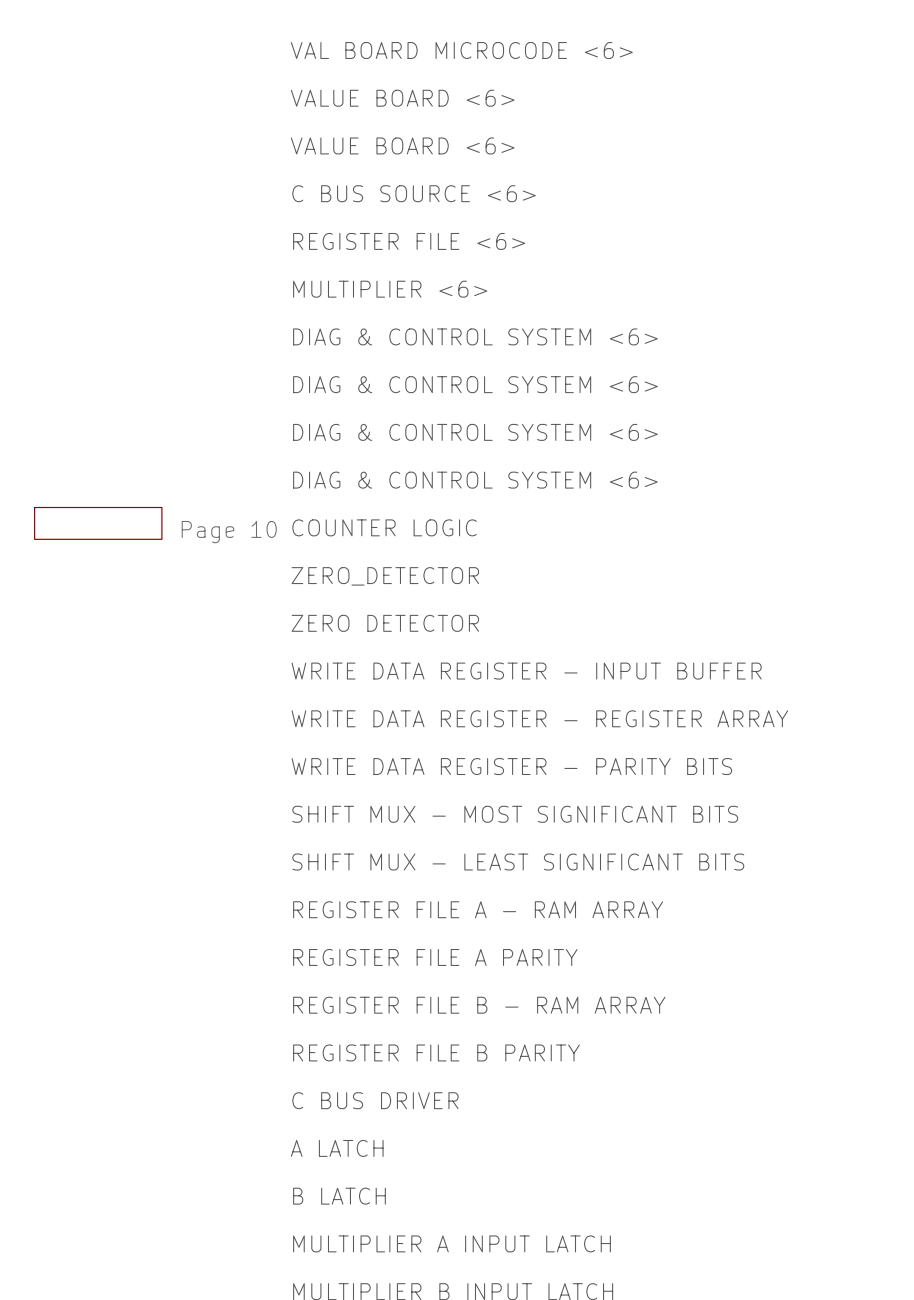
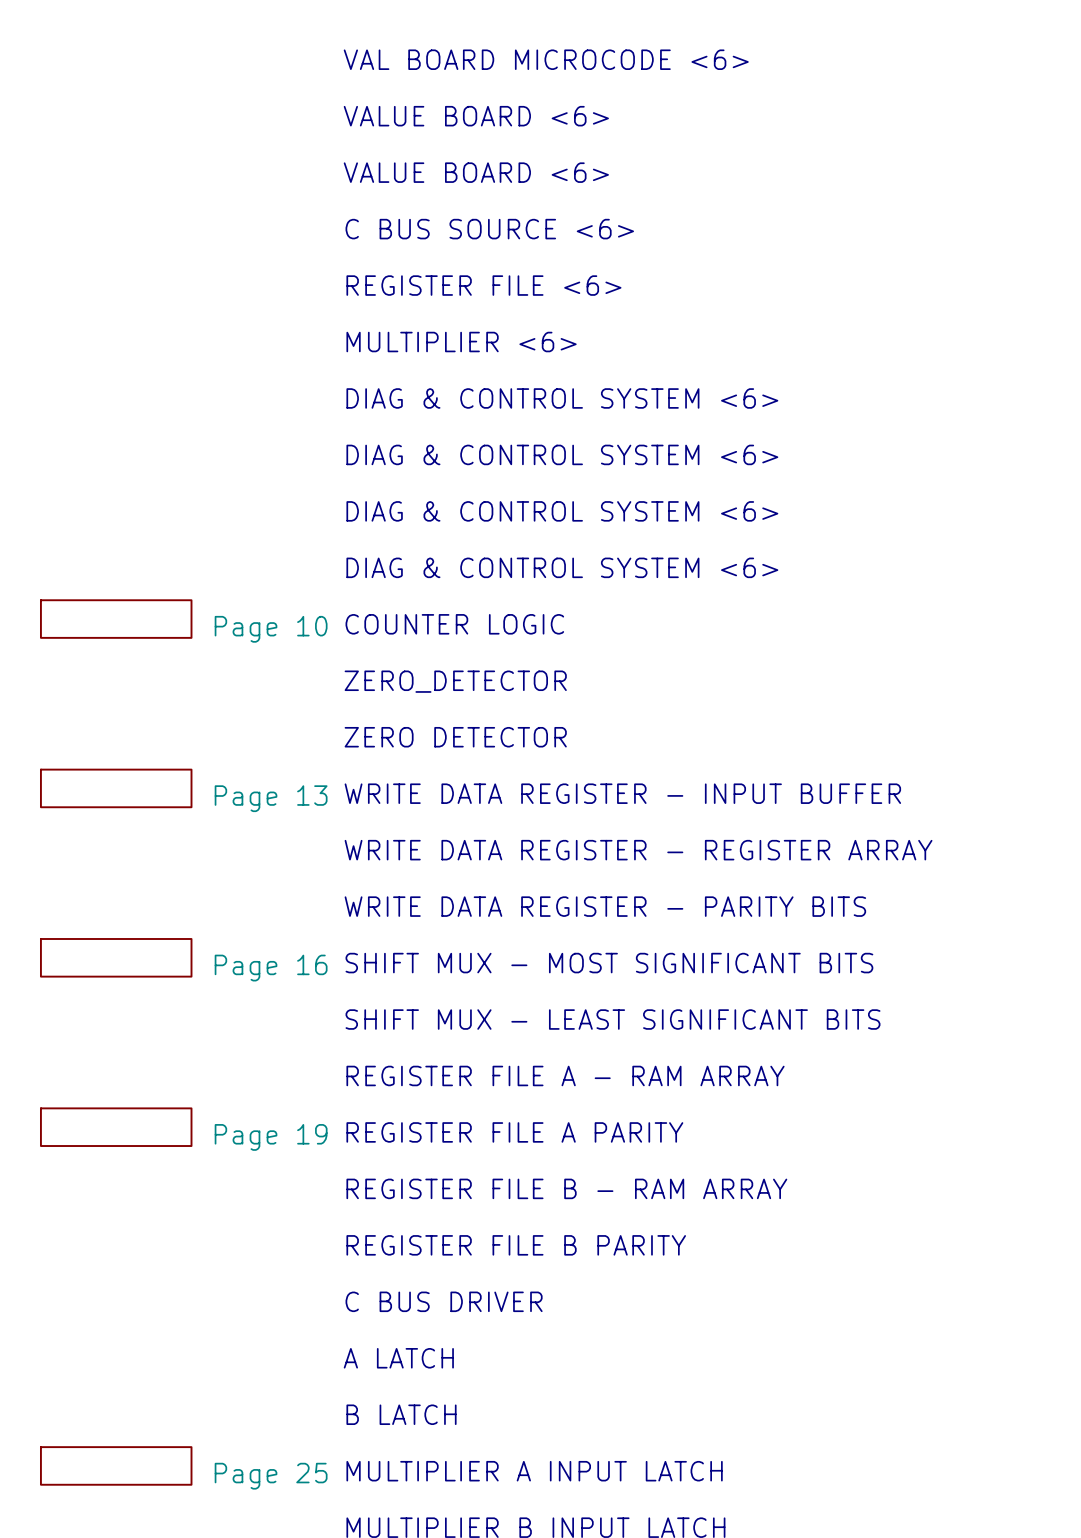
sheet Page 13: none -> (116, 788)
sheet Page 16: none -> (116, 957)
sheet Page 19: none -> (116, 1127)
sheet Page 25: none -> (116, 1465)

